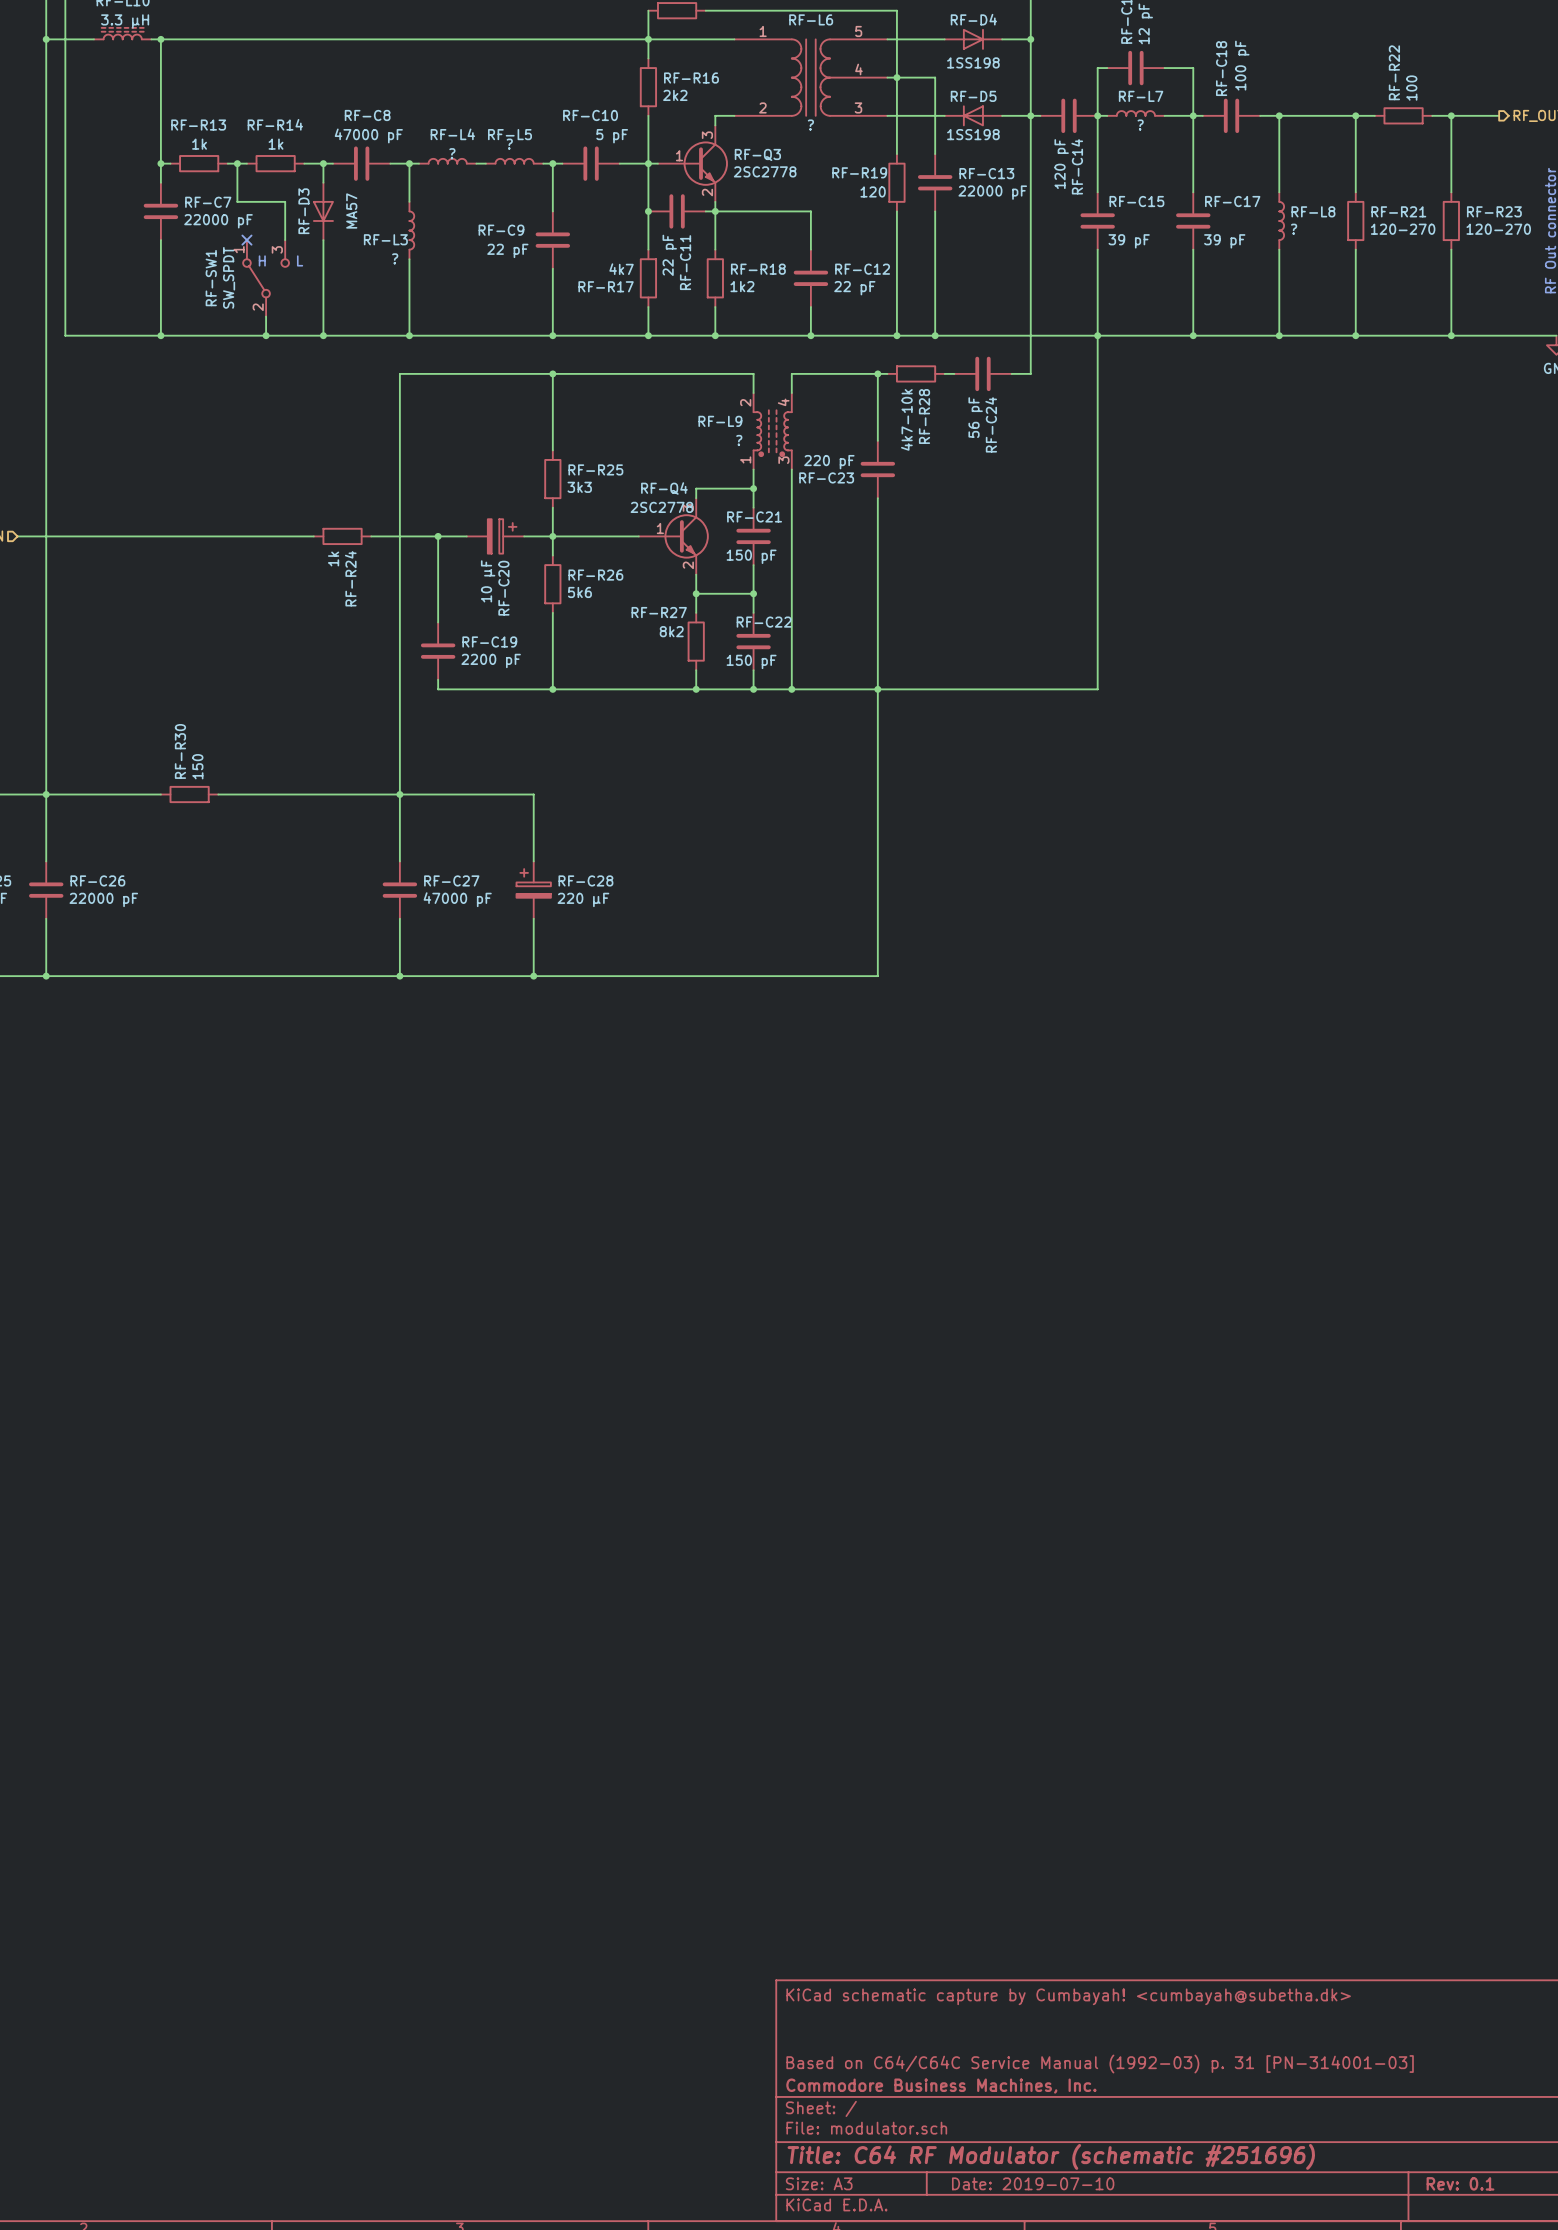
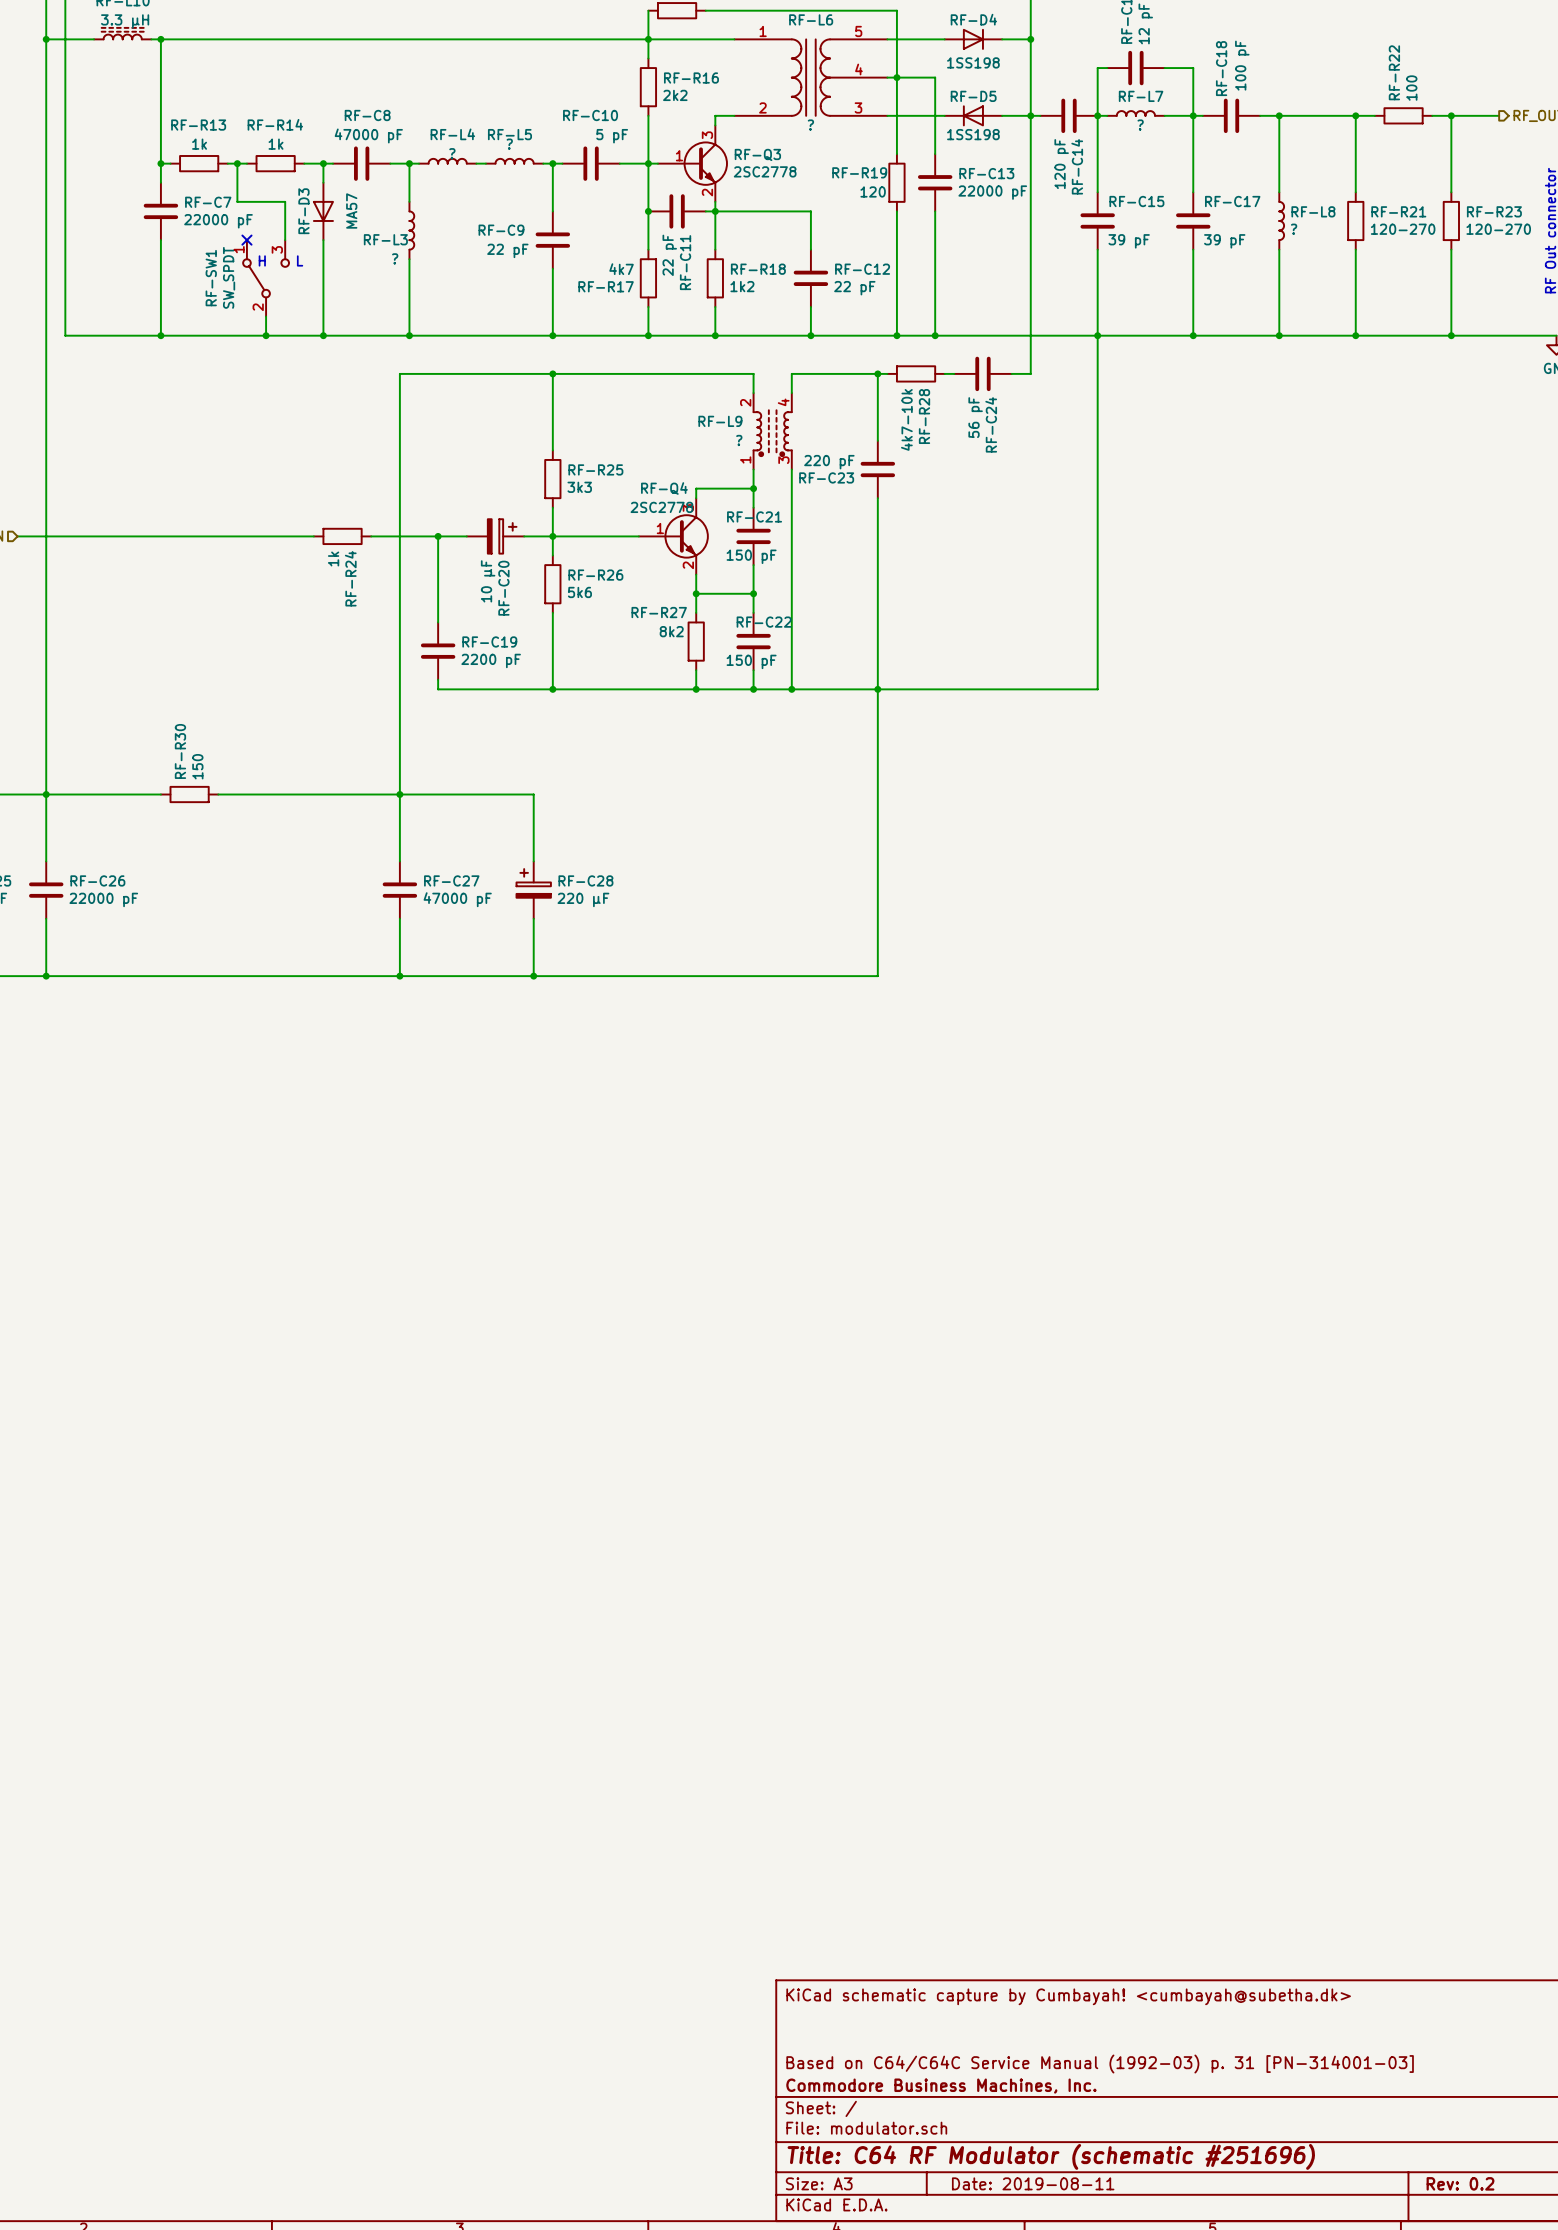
title block: Date: 2019-07-10 (1033, 2183) -> Date: 2019-08-11 (1033, 2183)
title block: Rev: 0.1 (1460, 2183) -> Rev: 0.2 (1460, 2183)

